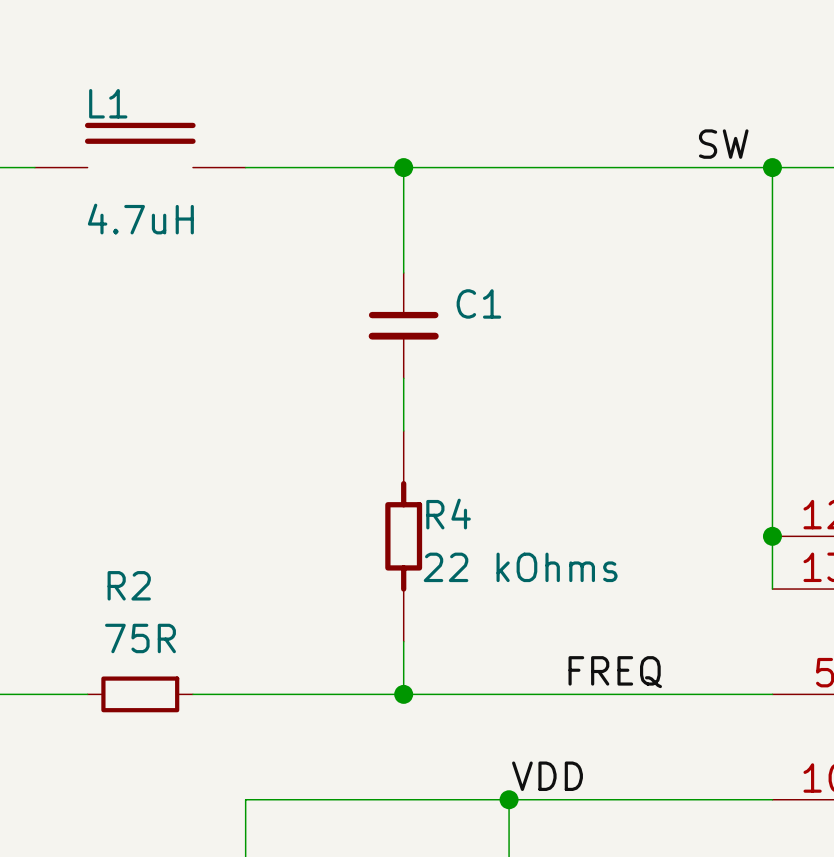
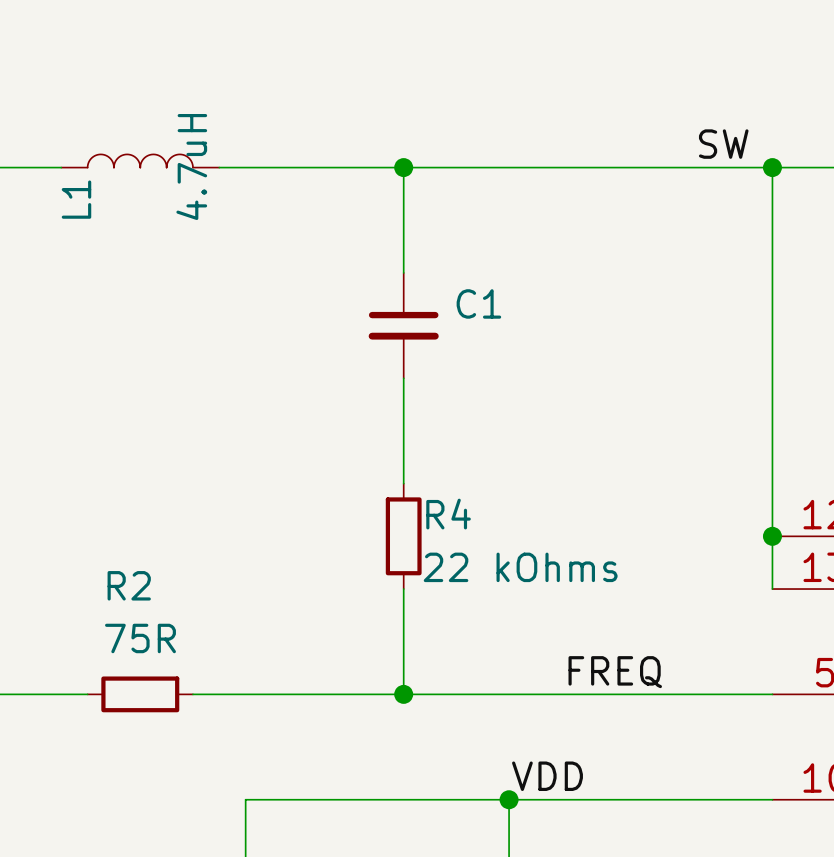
L1 name position: L1 (108, 103) -> L1 (76, 199)
L1 symbol: [34, 122, 246, 168] -> [61, 154, 220, 168]
L1 value position: 4.7uH (140, 219) -> 4.7uH (191, 167)
R4 symbol: [385, 430, 423, 642] -> [385, 483, 422, 590]

